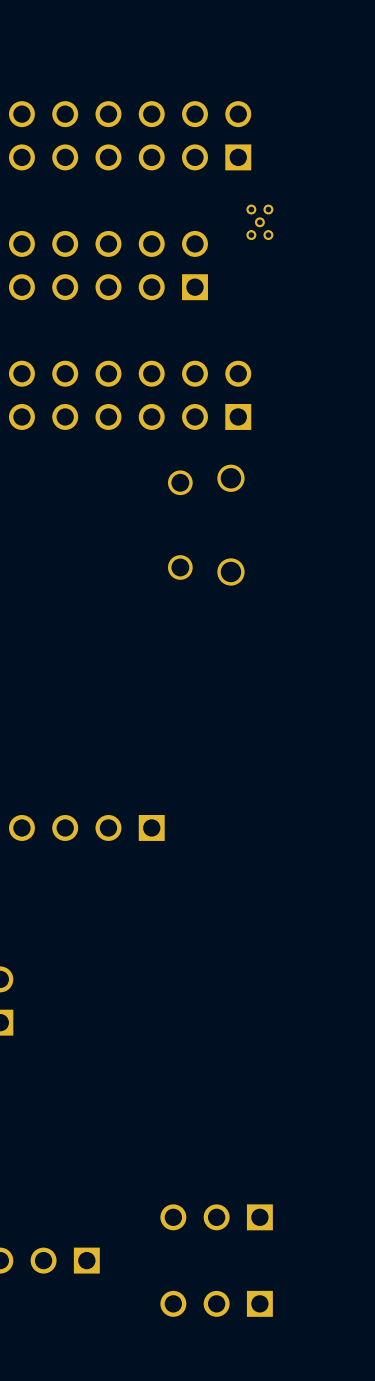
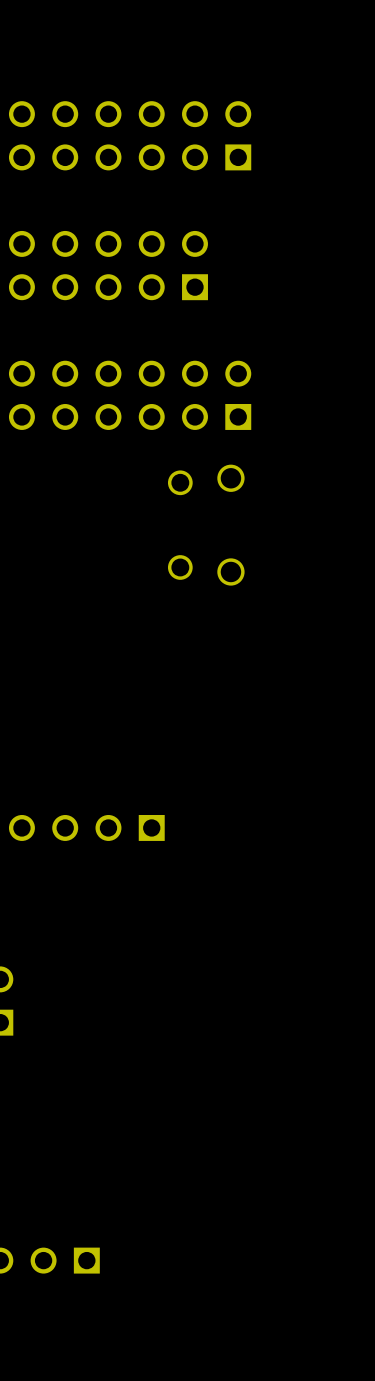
part: (259, 222) -> none
part: (216, 1217) -> none
part: (216, 1303) -> none

